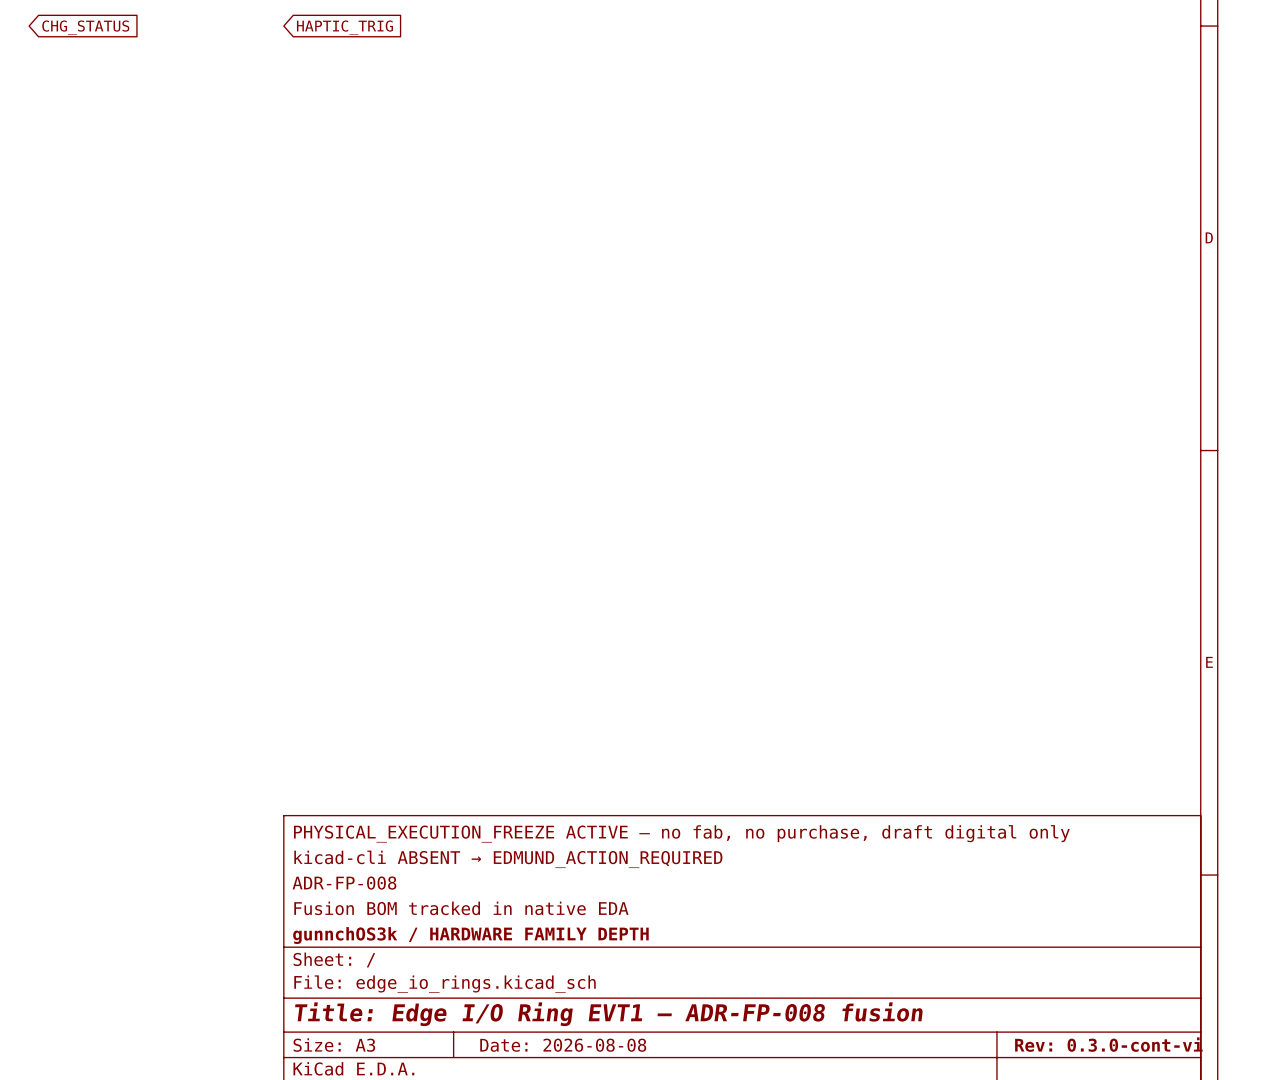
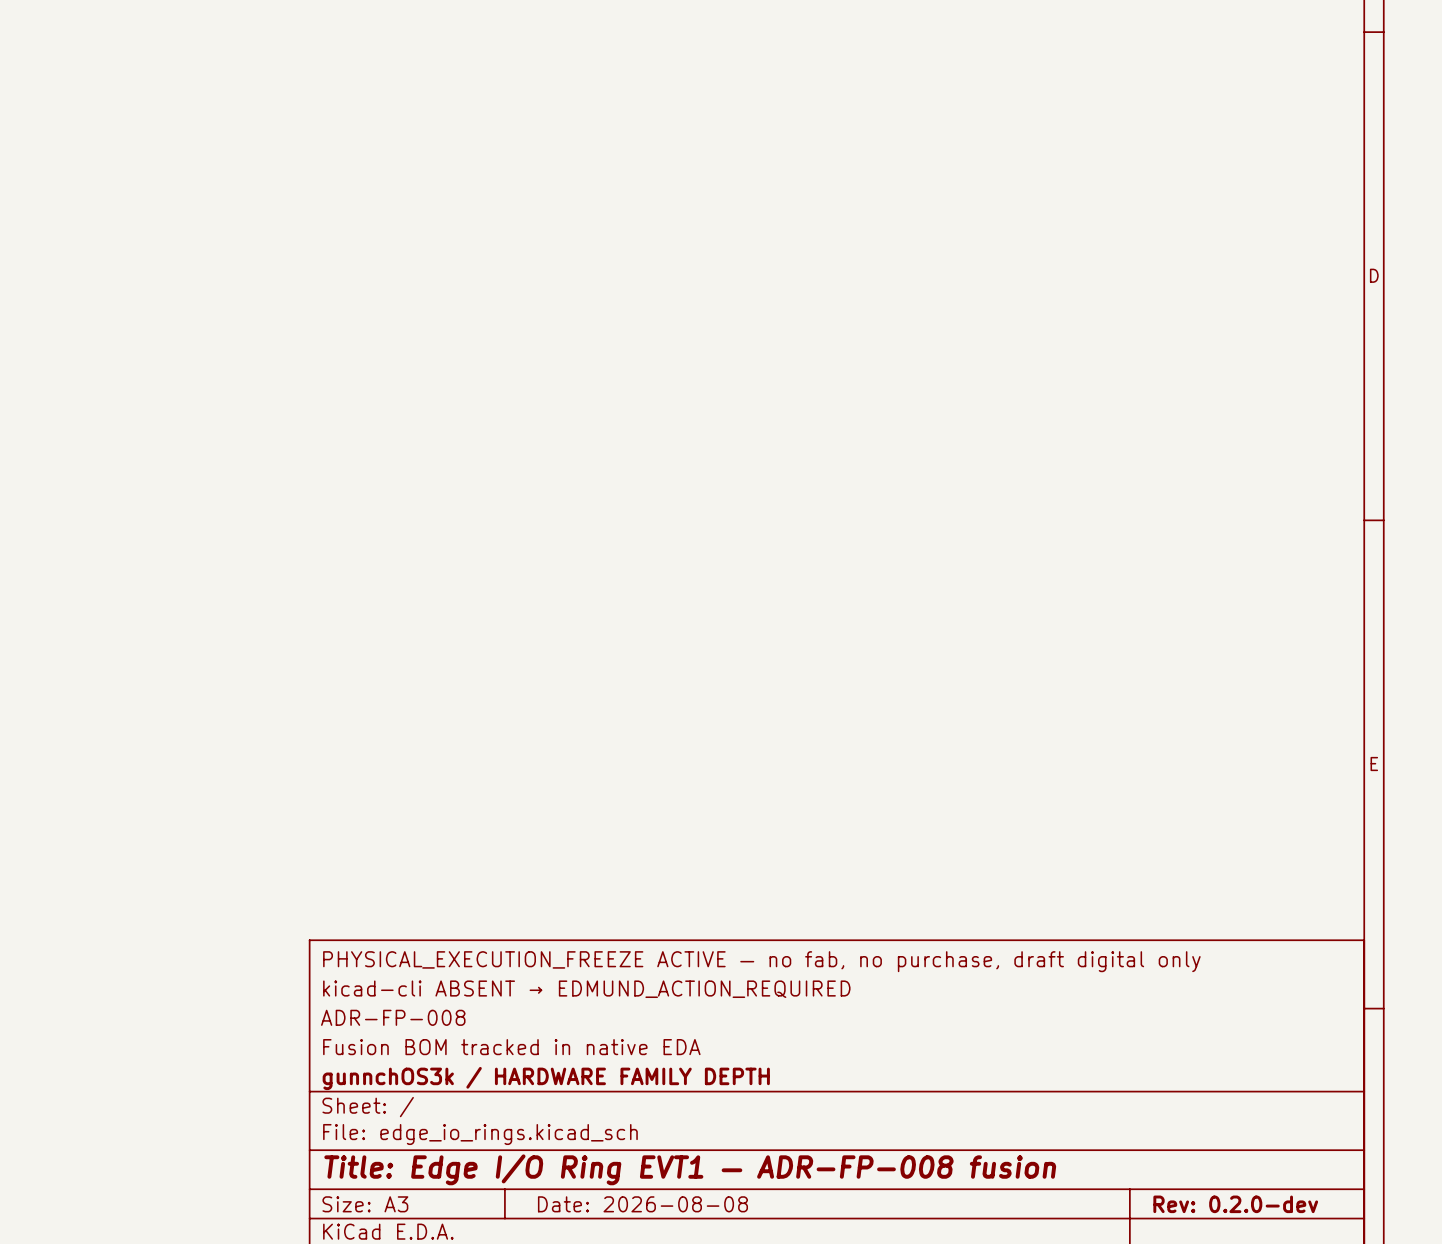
global label: CHG_STATUS (85, 27) -> none
global label: HAPTIC_TRIG (344, 27) -> none
title block: Rev: 0.3.0-cont-vi (1108, 1044) -> Rev: 0.2.0-dev (1235, 1204)

